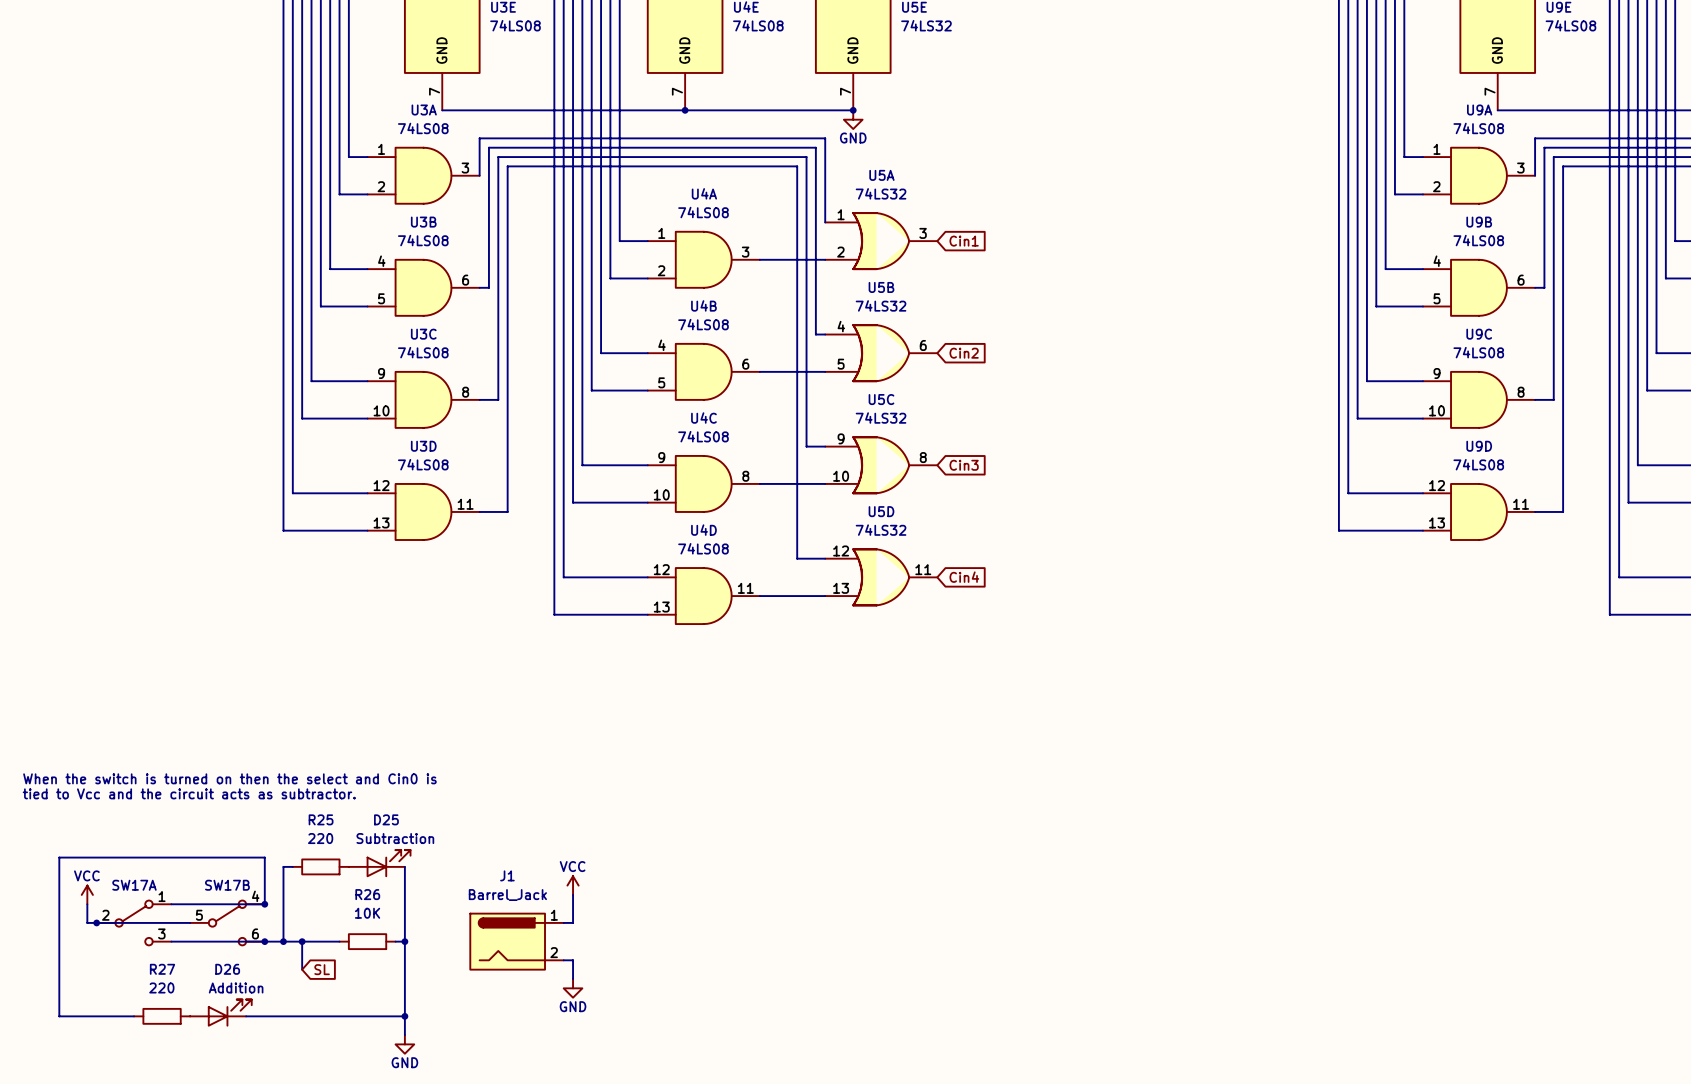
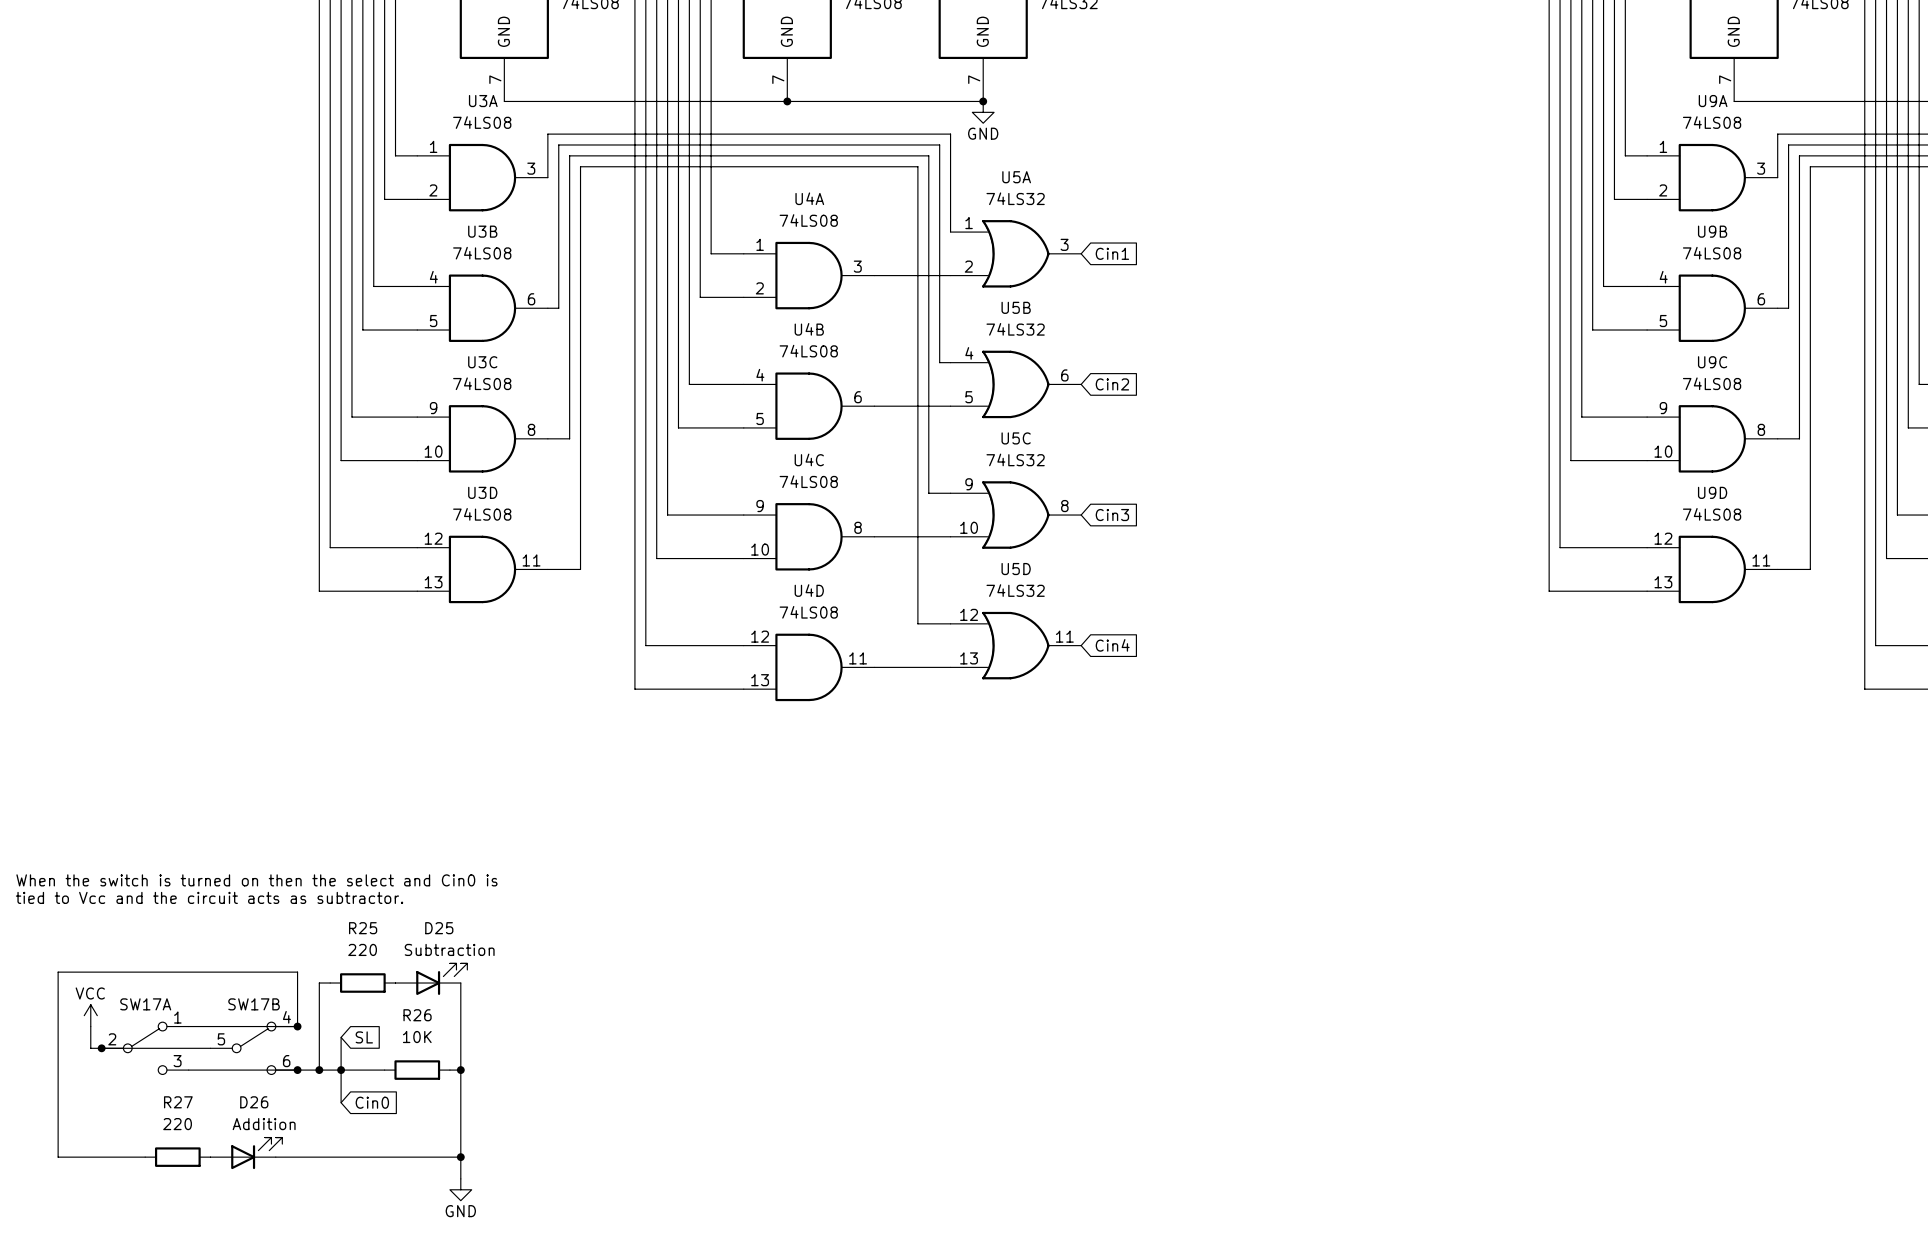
power symbol: VCC (573, 885) -> none
wire: (573, 894) (573, 922) (563, 922) -> none
wire: none -> (341, 1037) (341, 1070)
global label: none -> SL (364, 1037)
J1: Barrel_Jack (516, 941) -> none
wire: (563, 960) (573, 960) (573, 978) -> none
global label: SL (322, 969) -> Cin0 (372, 1102)
power symbol: GND (573, 988) -> none

